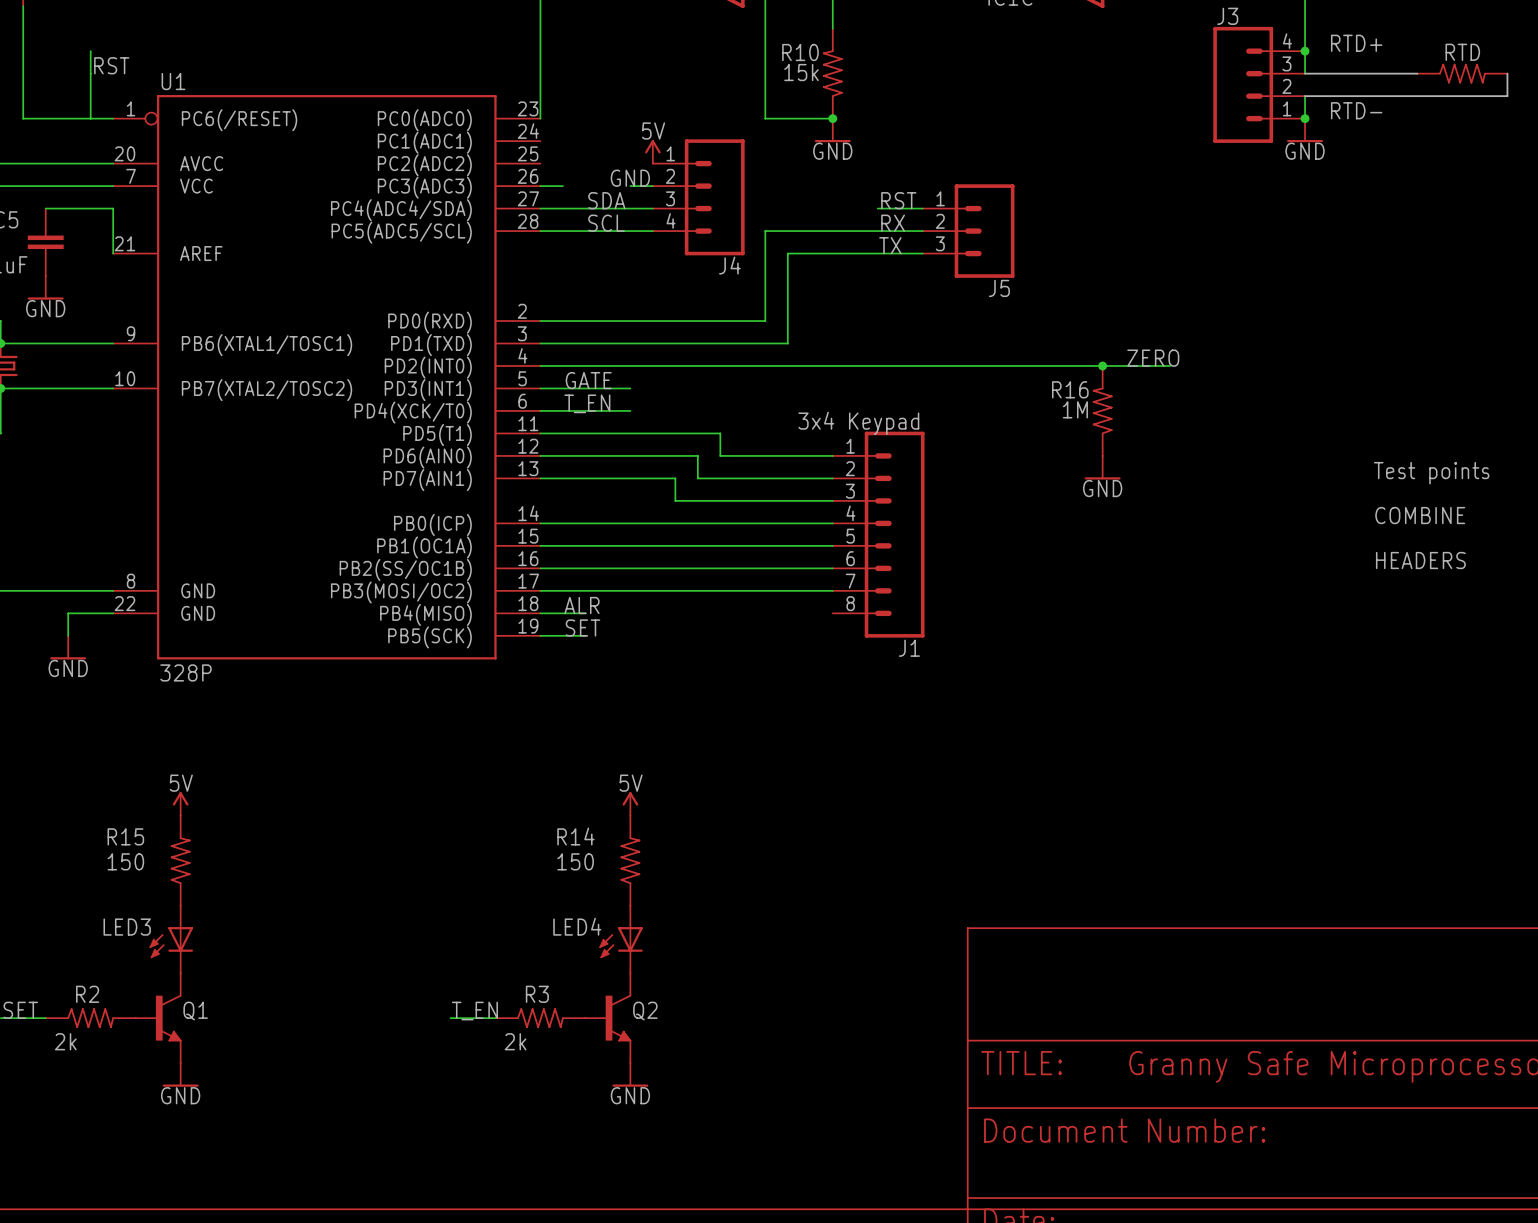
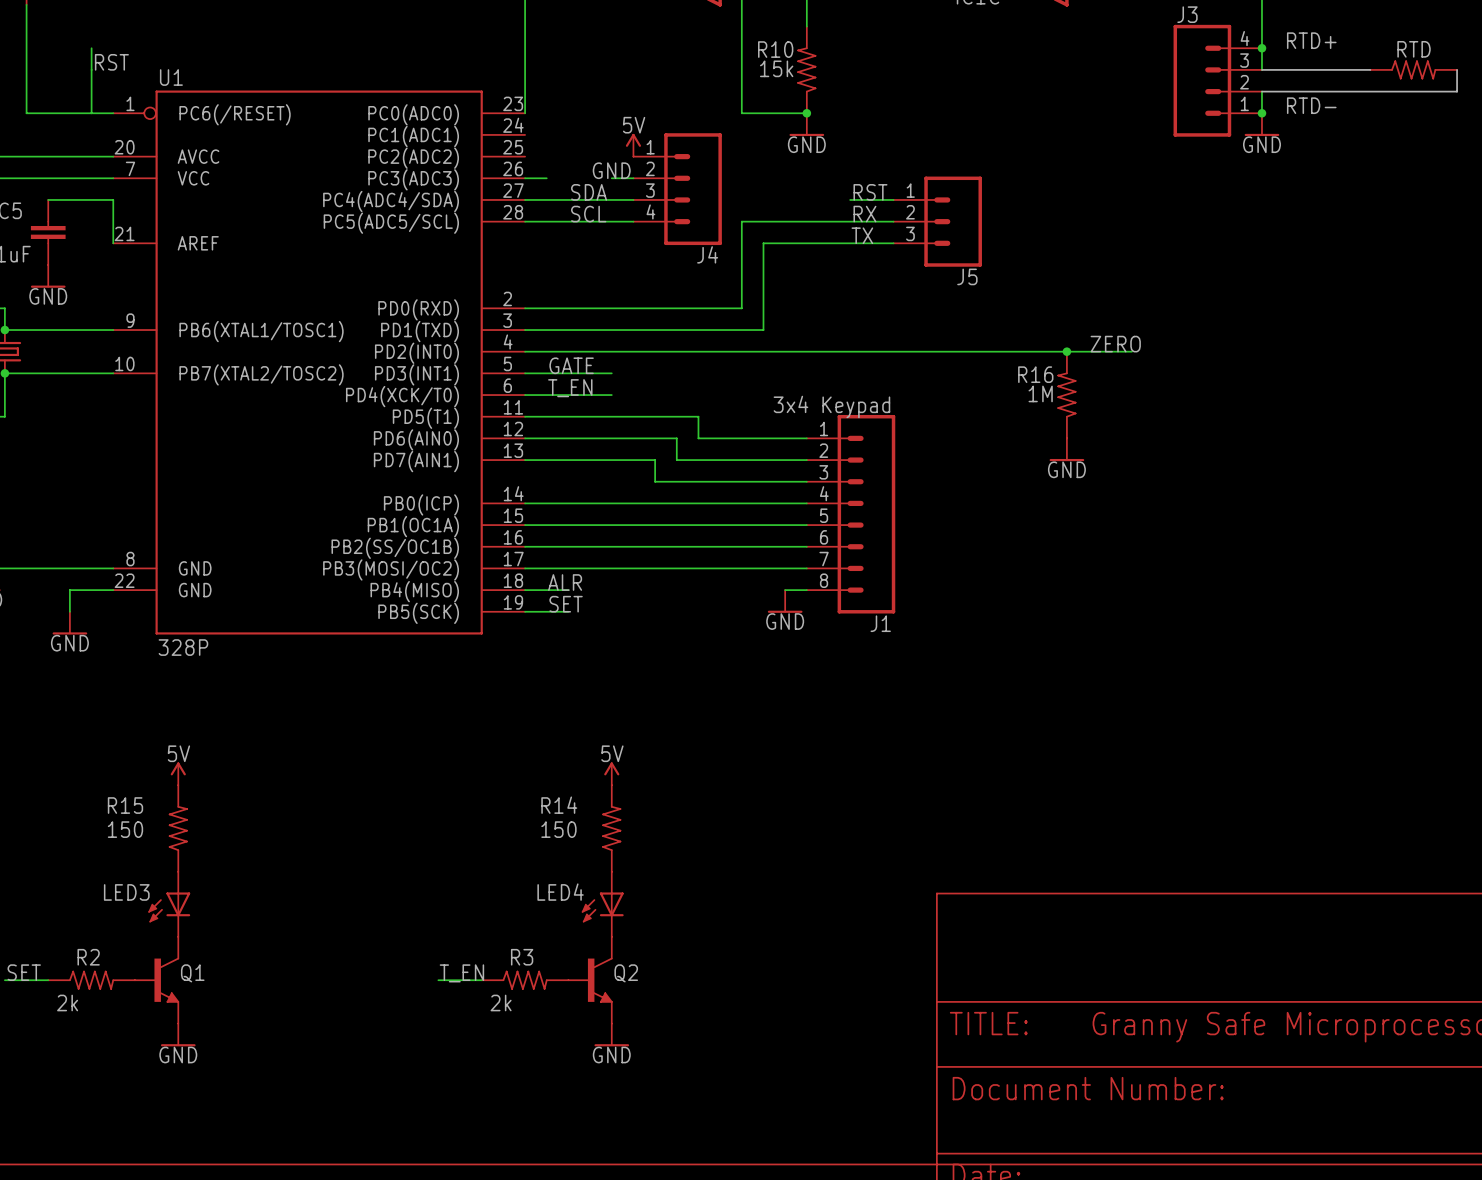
text: Test points (1431, 473) -> none
text: COMBINE (1420, 515) -> none
text: HEADERS (1420, 560) -> none
wire: none -> (785, 590) (806, 590)
power symbol: none -> GND (785, 601)

